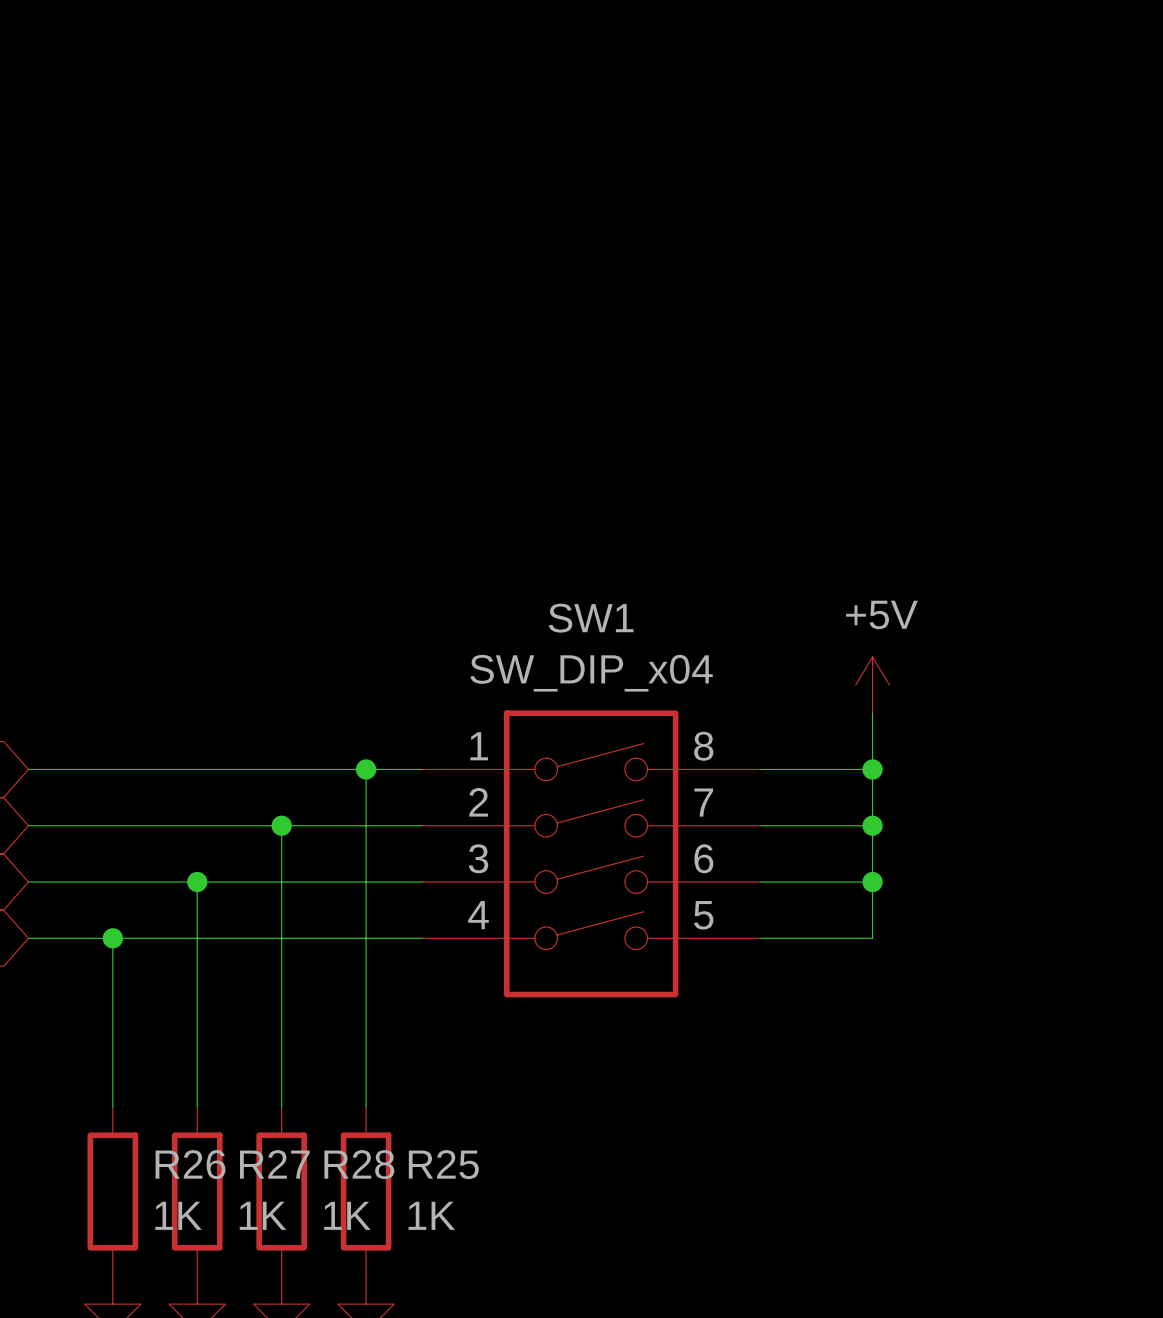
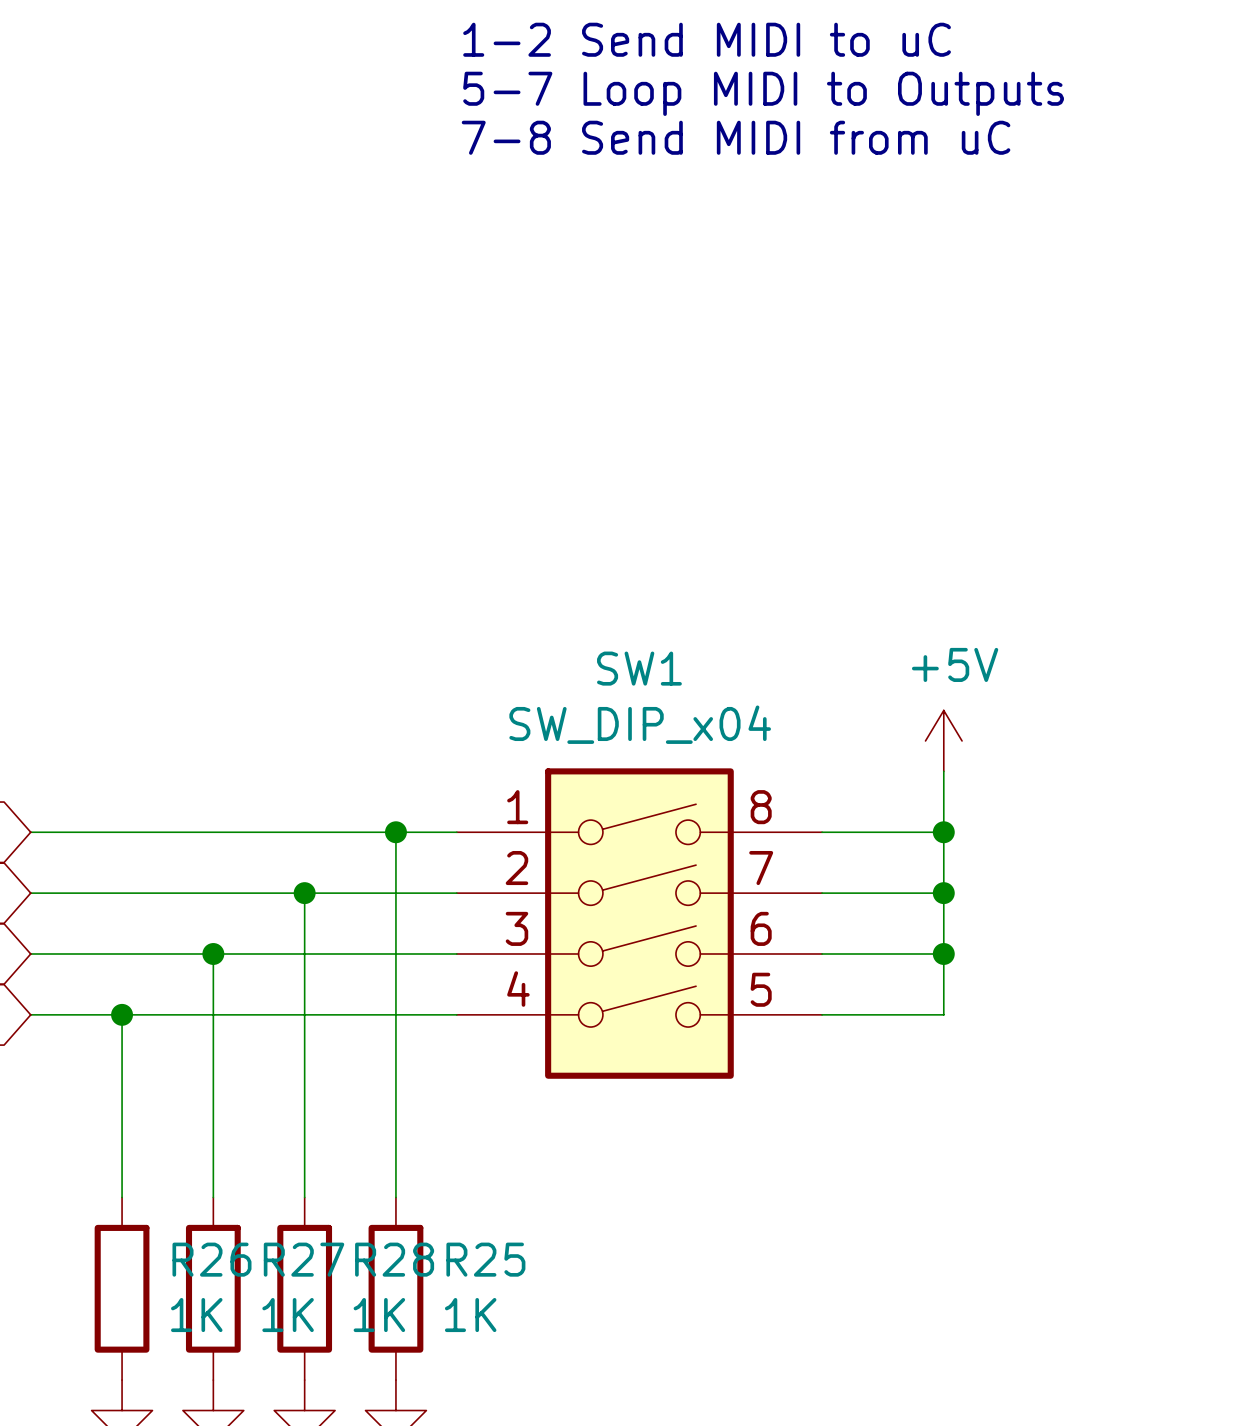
text: none -> 1-2 Send MIDI to uC (707, 39)
text: none -> 5-7 Loop MIDI to Outputs (763, 93)
text: none -> 7-8 Send MIDI from uC (736, 137)

